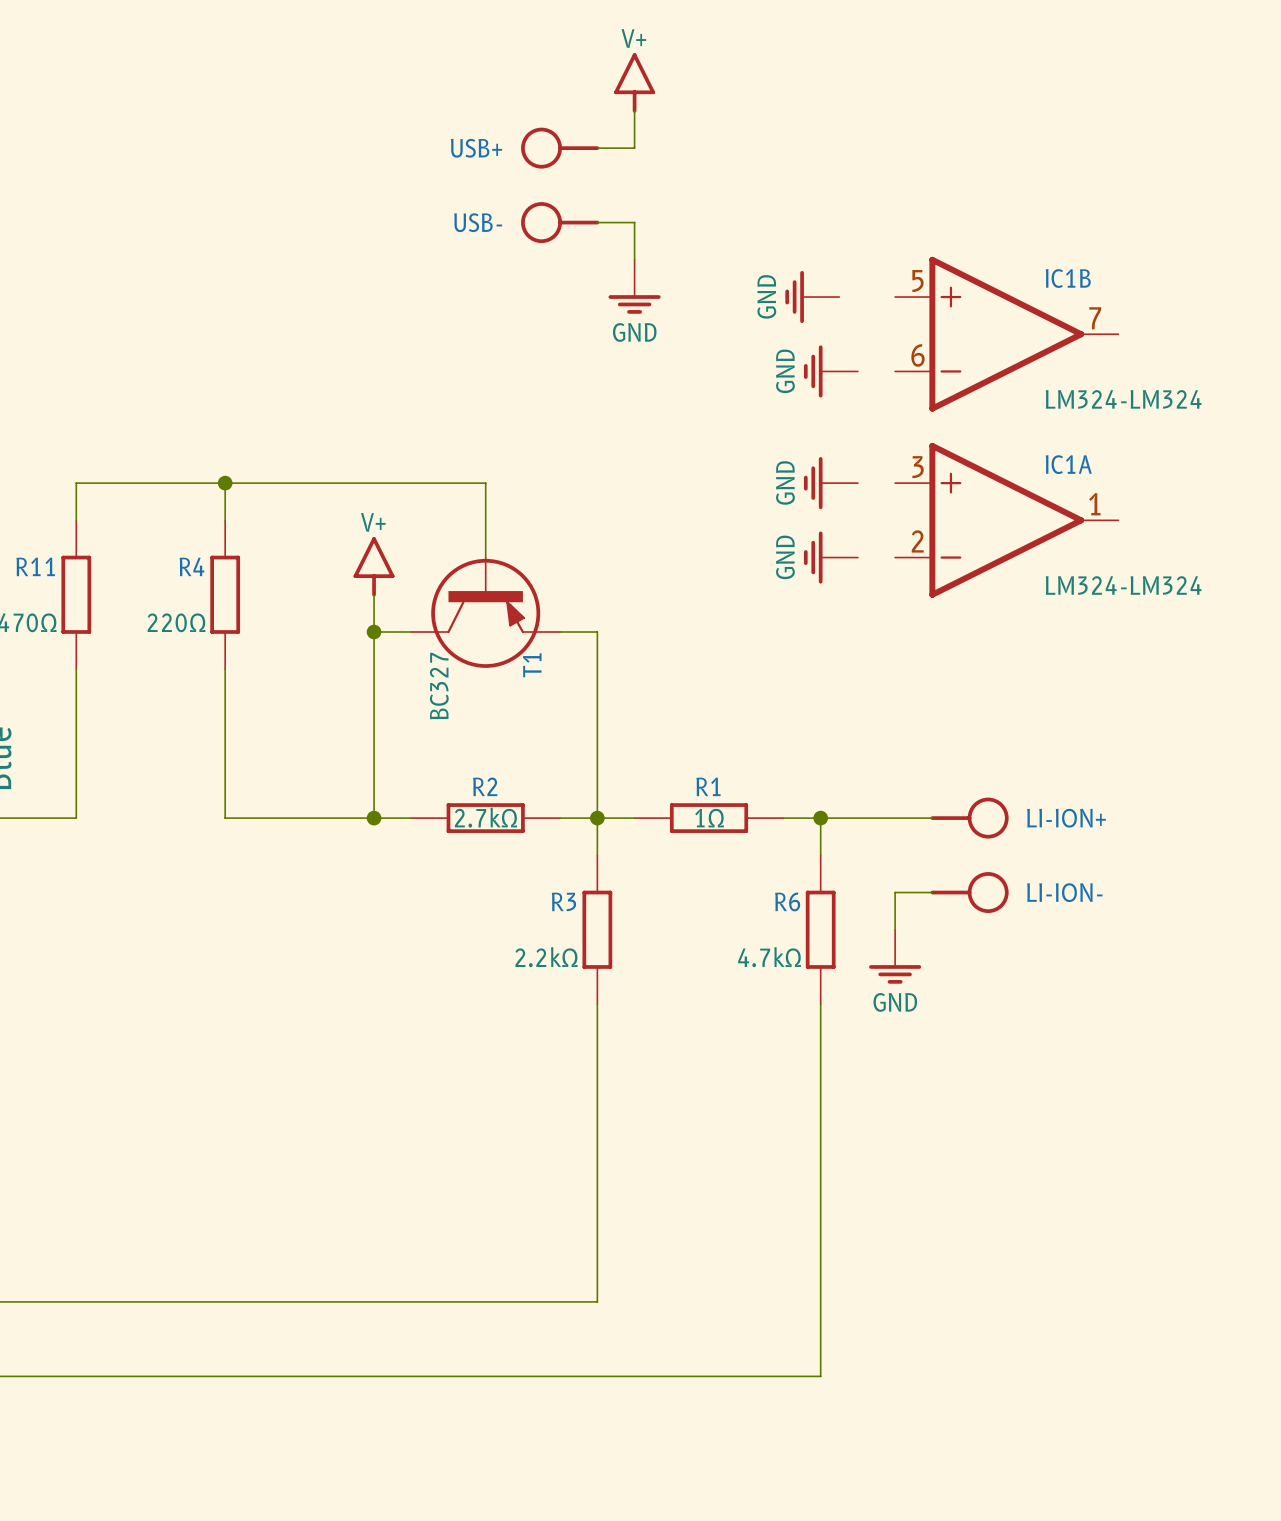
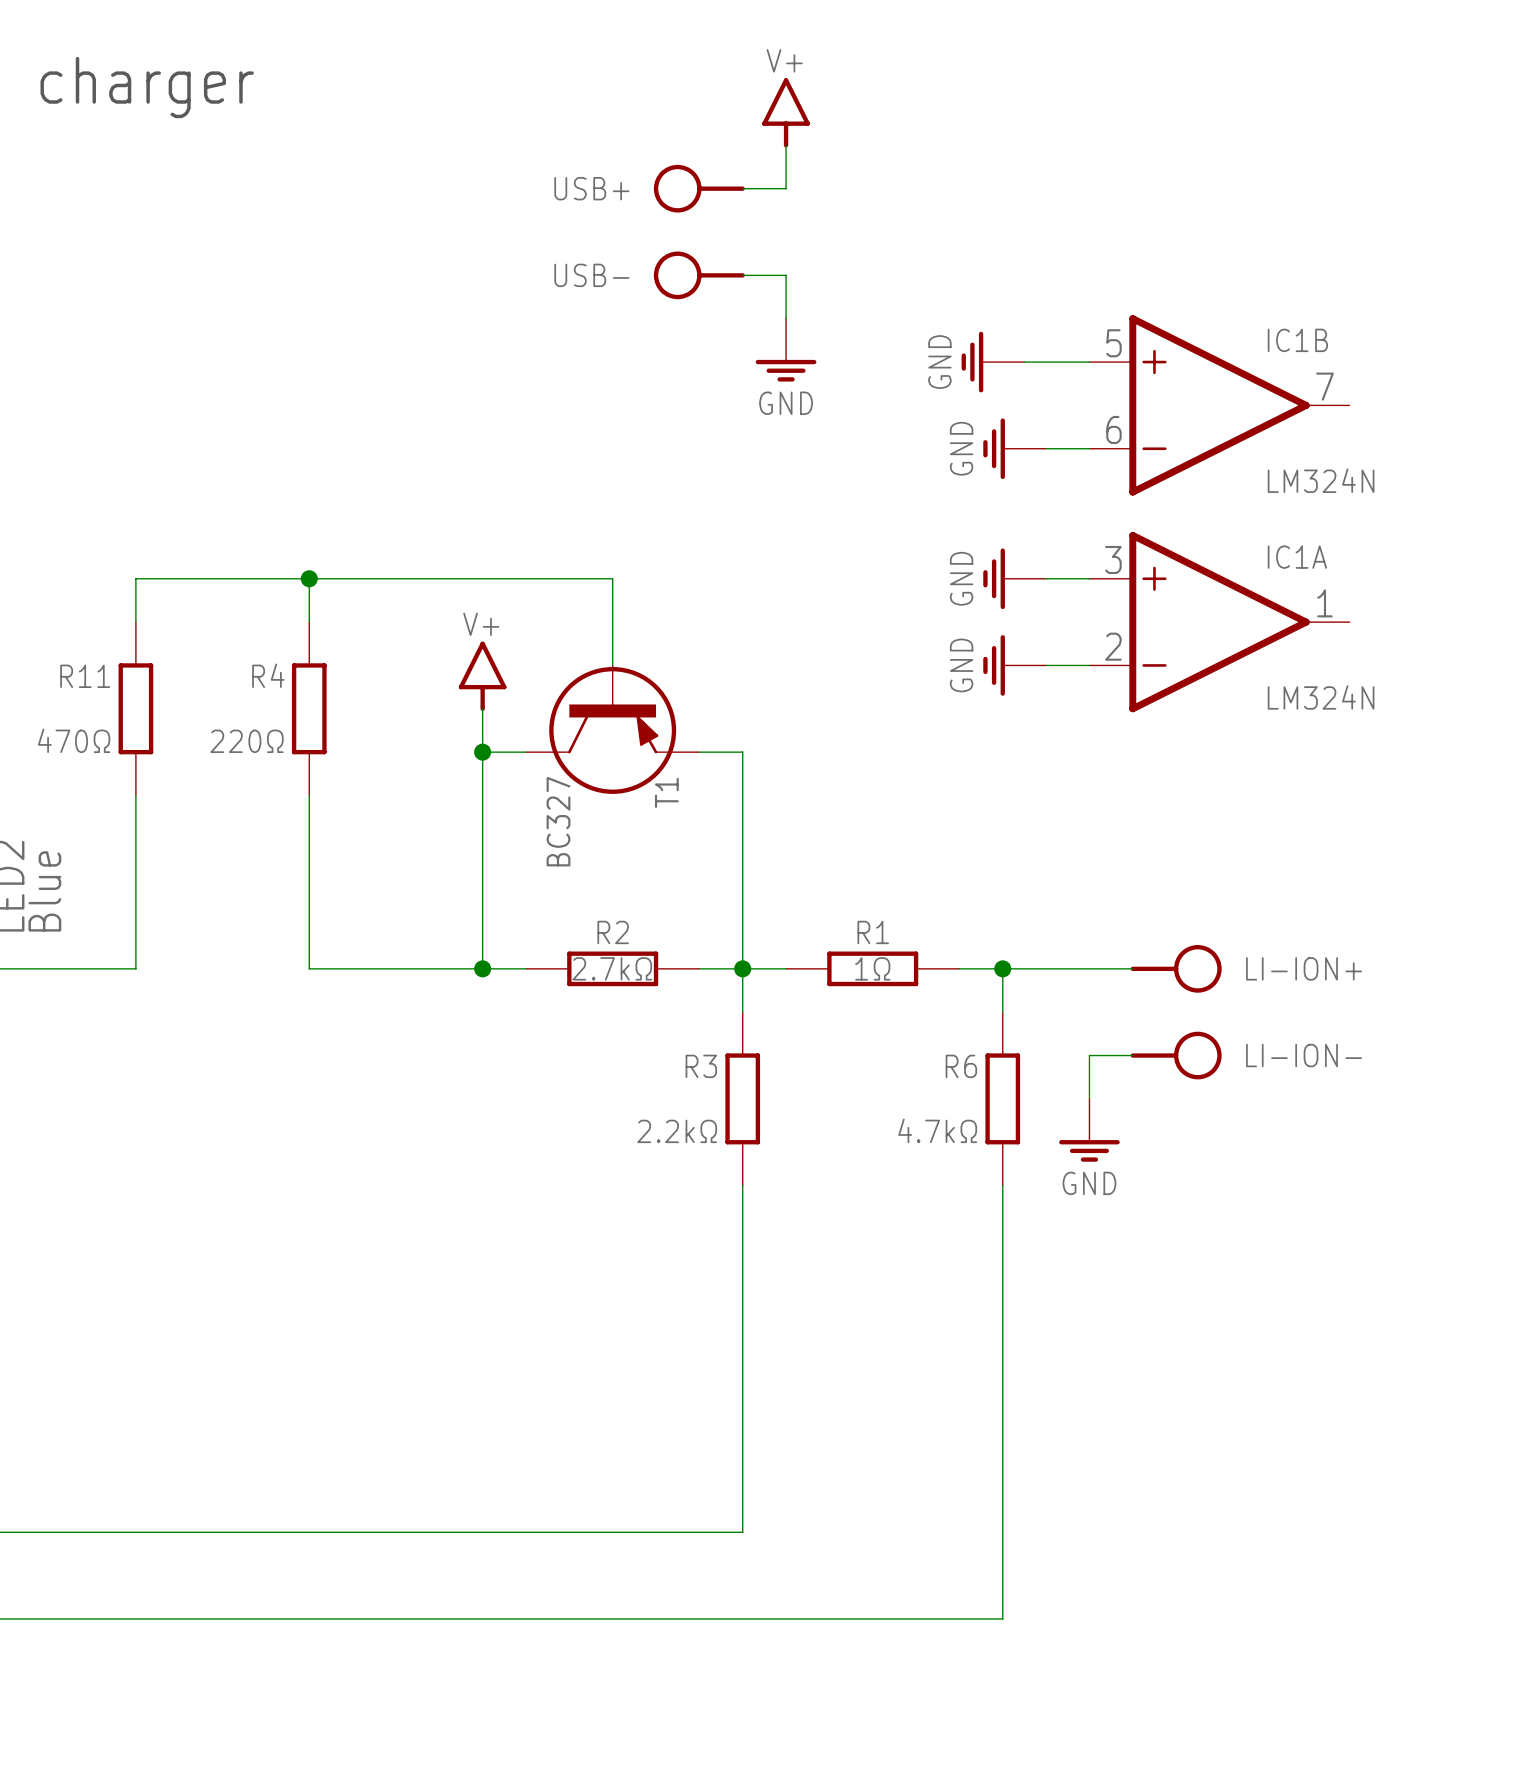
wire: none -> (1024, 362) (1089, 362)
wire: none -> (1046, 448) (1089, 448)
IC1B value: LM324-LM324 (1123, 399) -> LM324N (1321, 480)
wire: none -> (1046, 578) (1089, 578)
wire: none -> (1046, 665) (1089, 665)
IC1A value: LM324-LM324 (1123, 585) -> LM324N (1321, 697)

